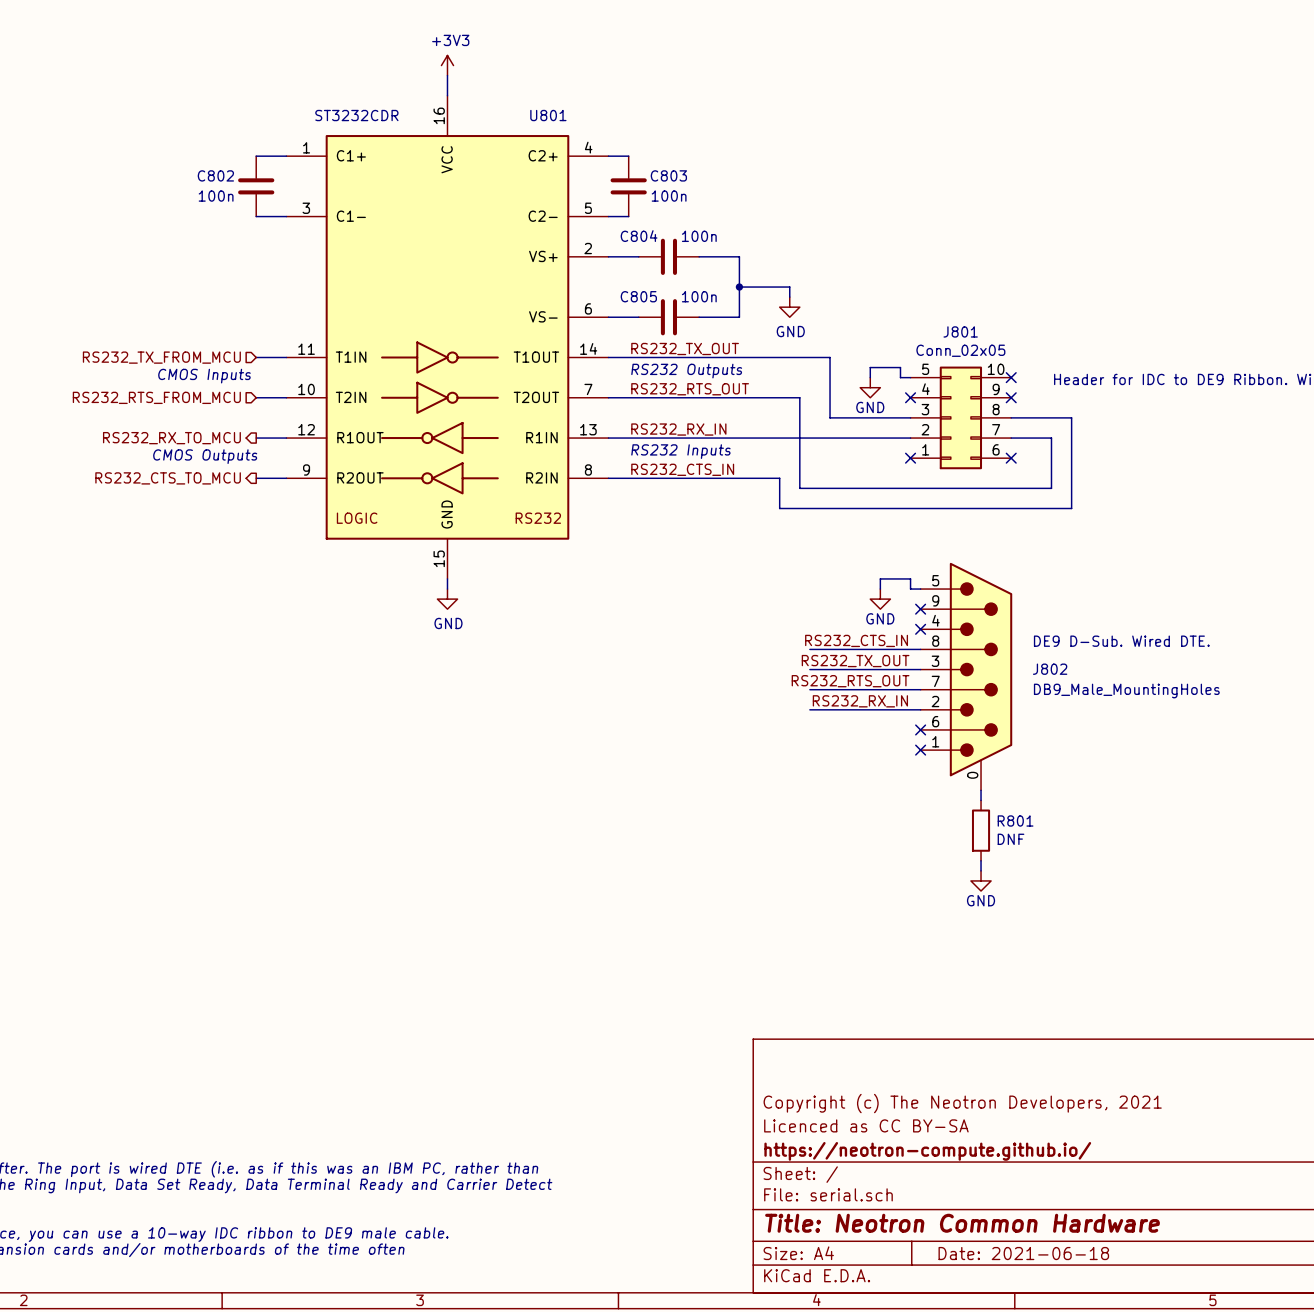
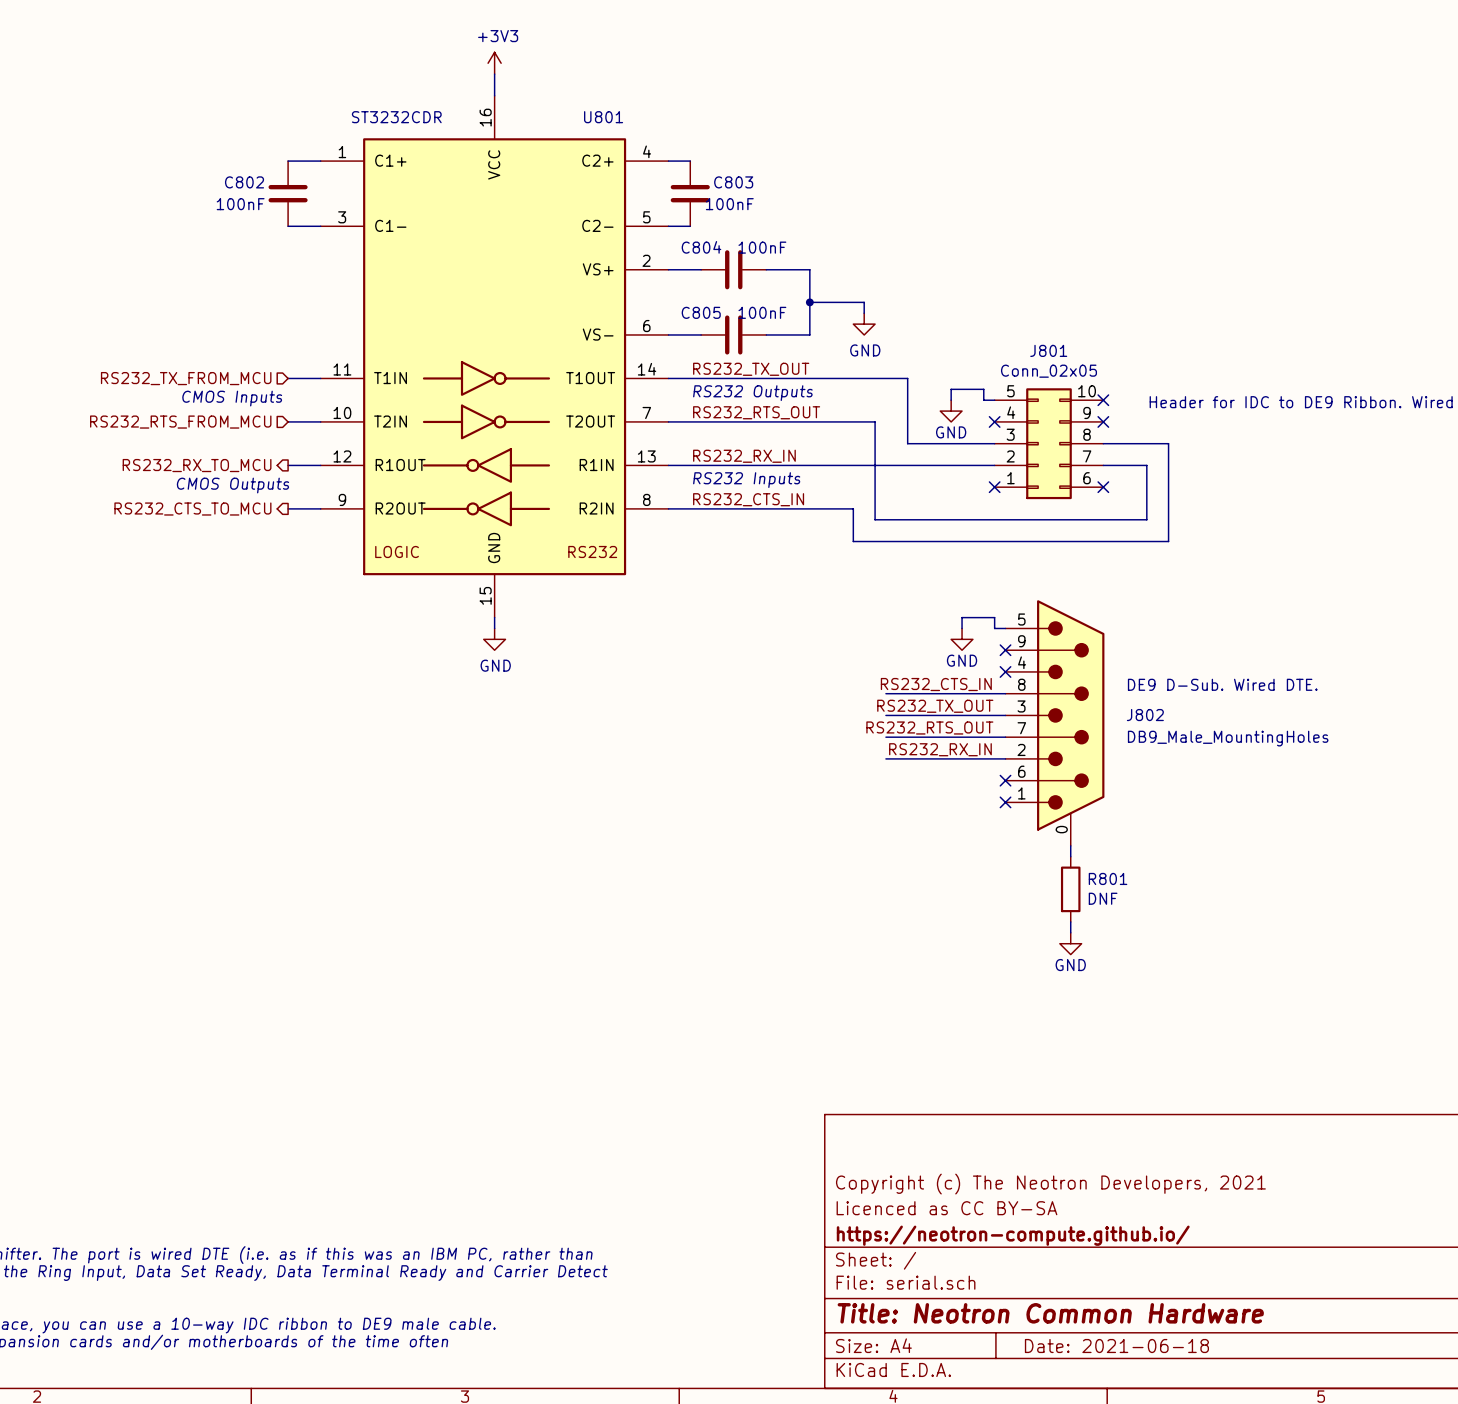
C802 value: 100n (216, 196) -> 100nF (240, 204)
C803 value: 100n (669, 196) -> 100nF (729, 204)
C804 value: 100n (699, 236) -> 100nF (762, 247)
C805 value: 100n (699, 296) -> 100nF (762, 312)

